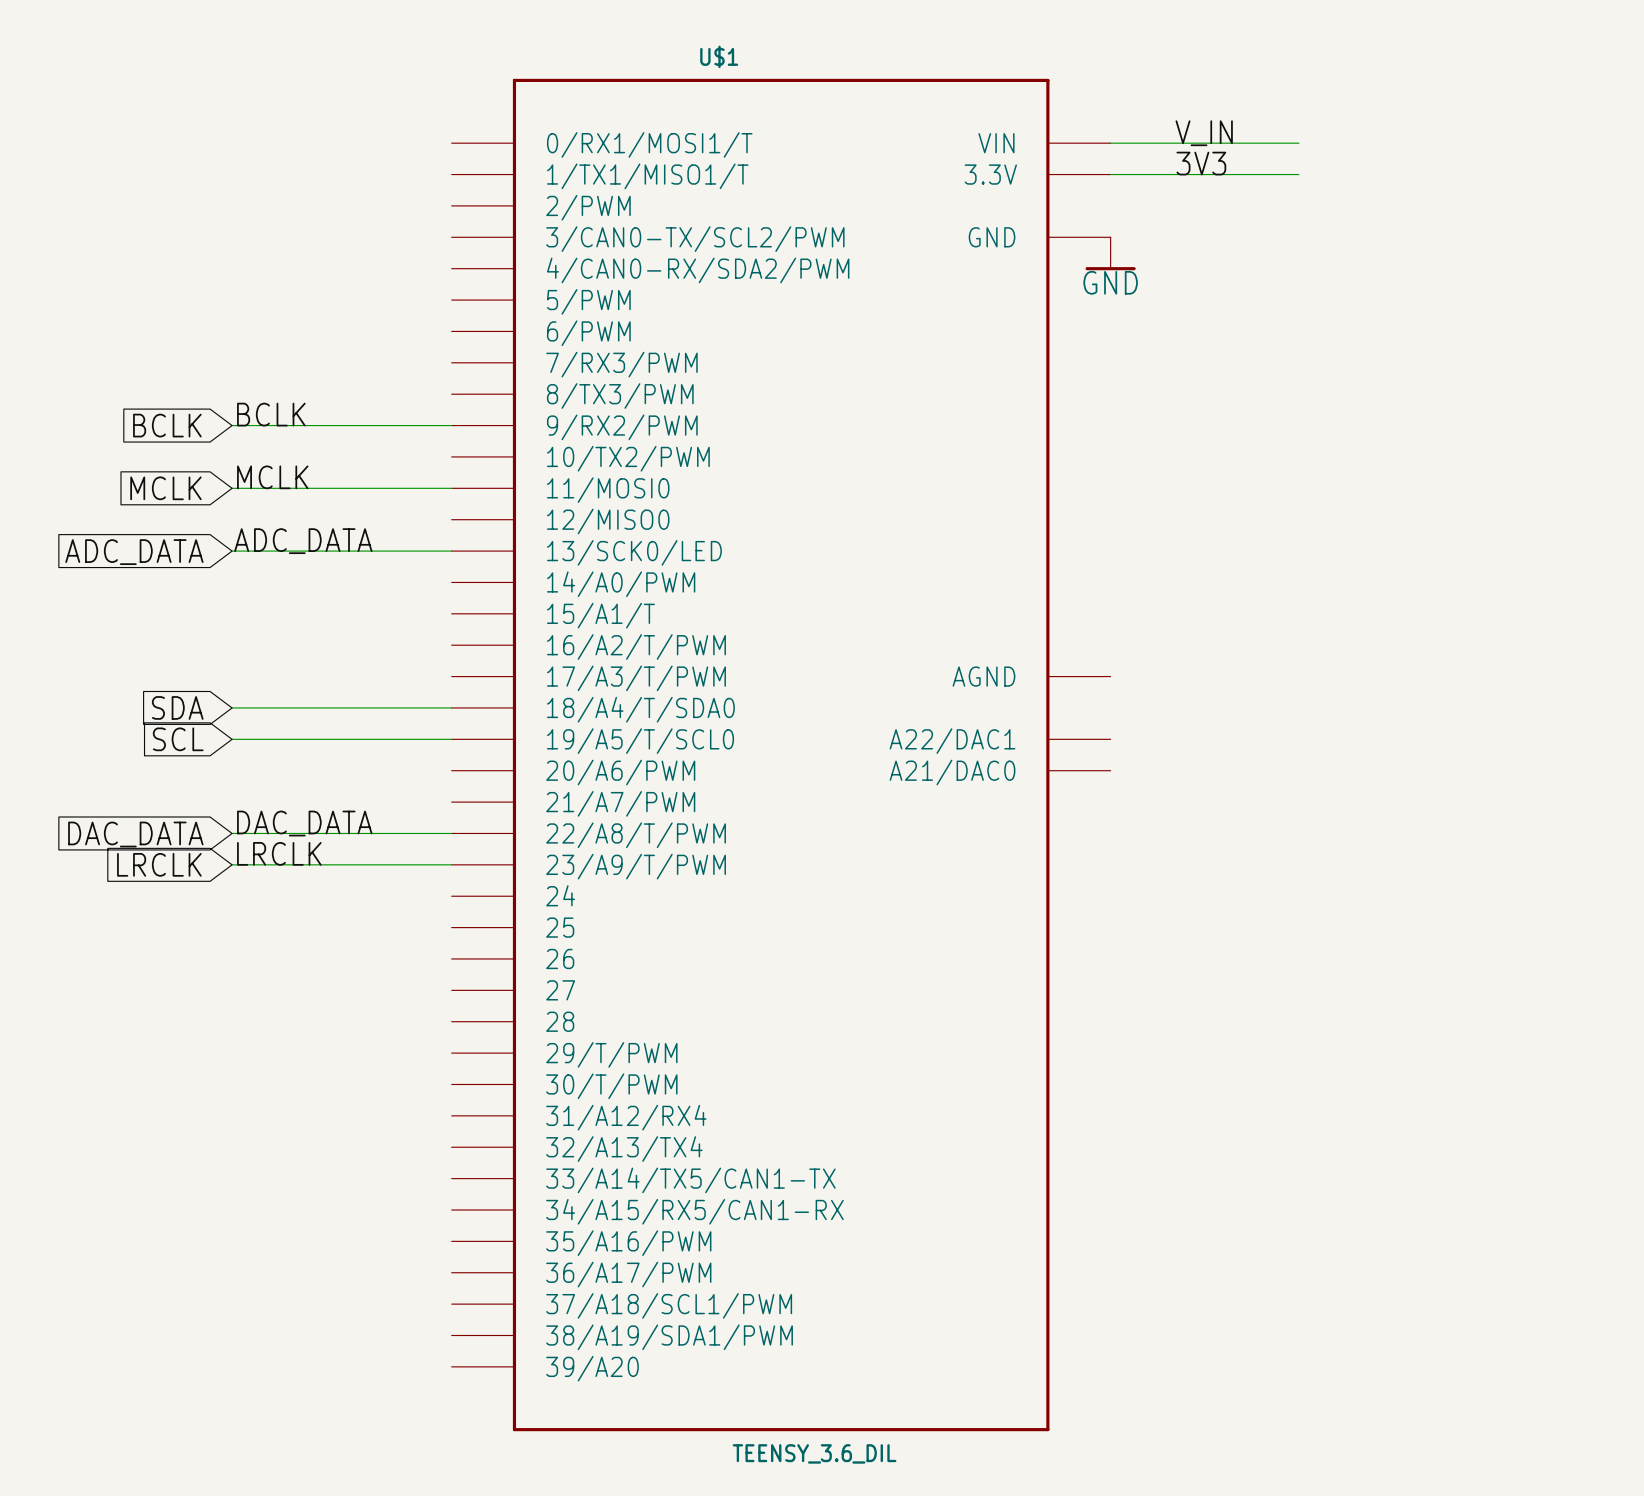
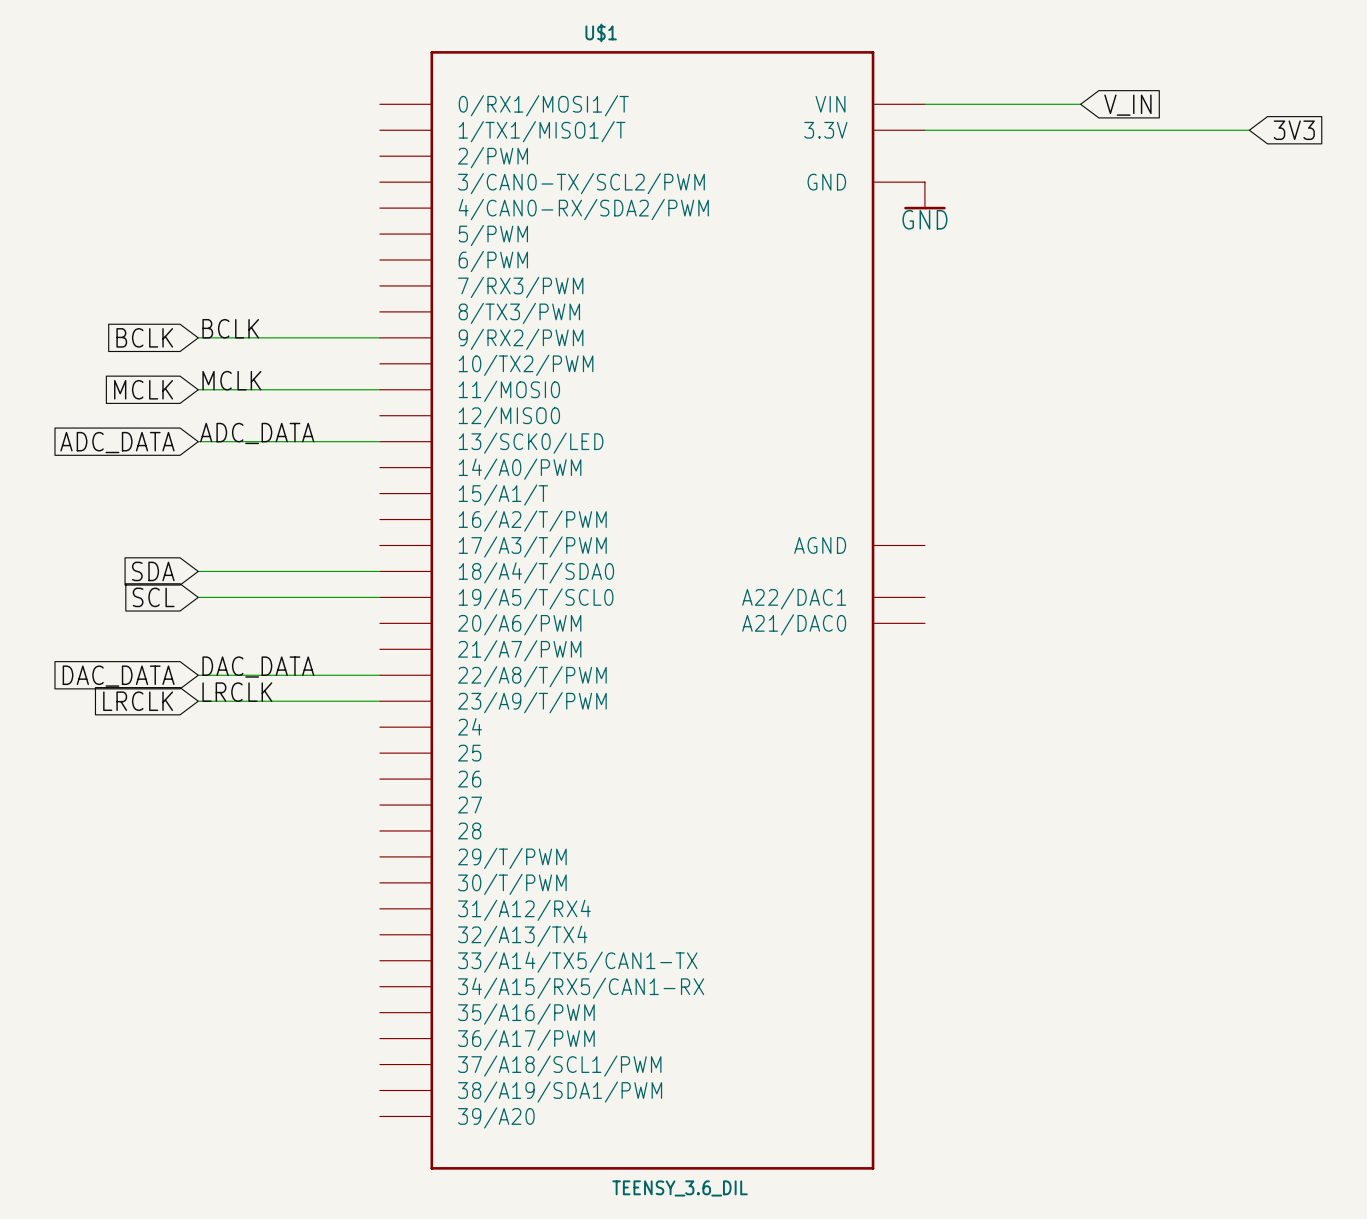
label: V_IN (1204, 133) -> none
global label: none -> V_IN (1127, 105)
label: 3V3 (1201, 163) -> none
wire: none -> (1080, 130) (1249, 130)
global label: none -> 3V3 (1294, 130)

